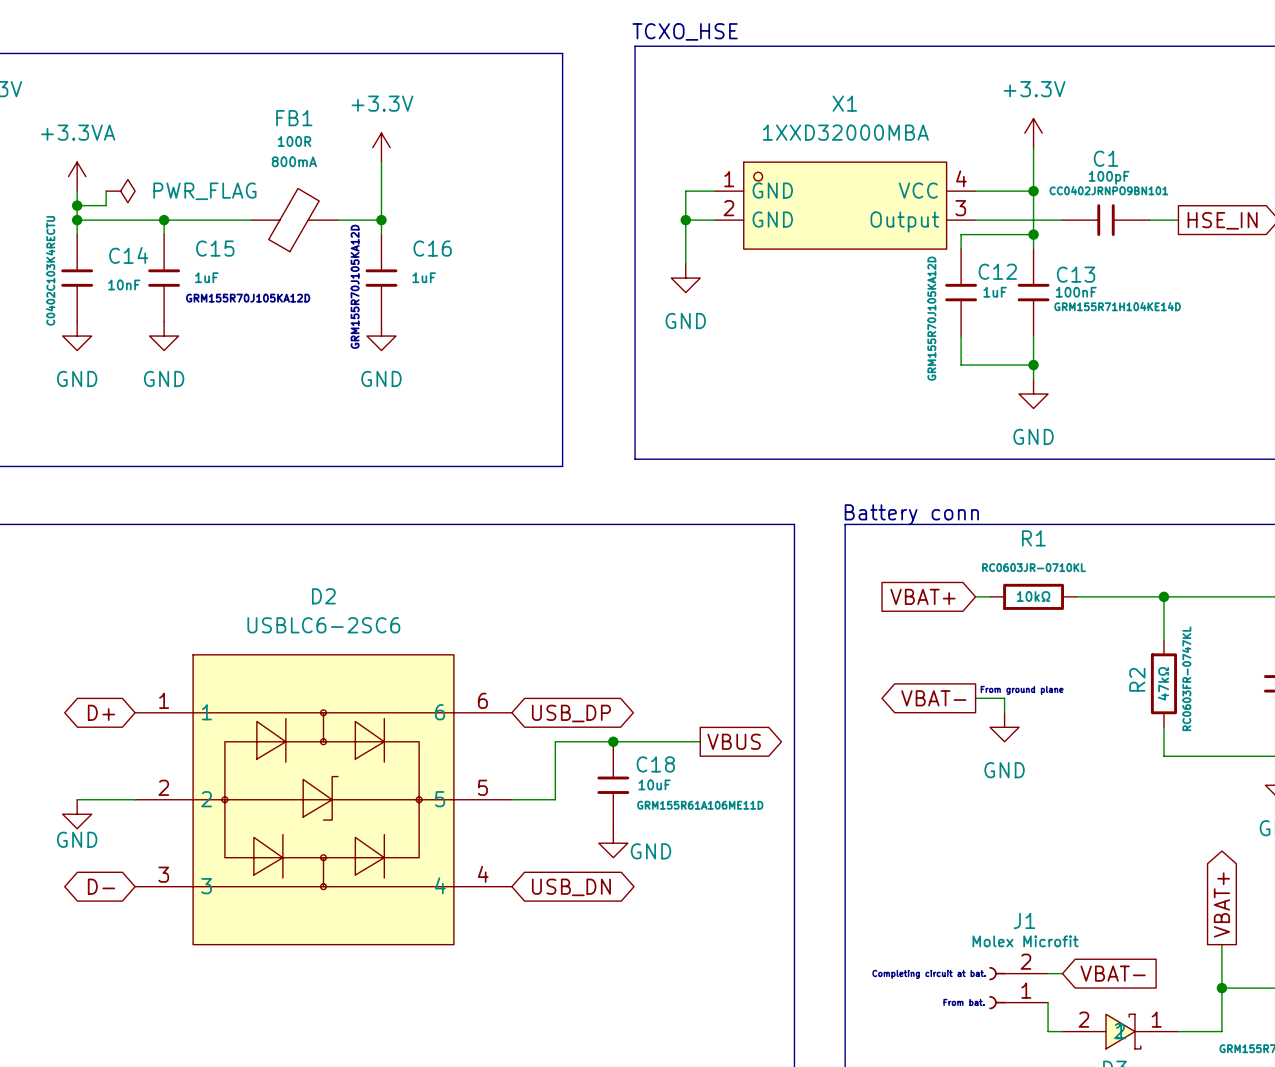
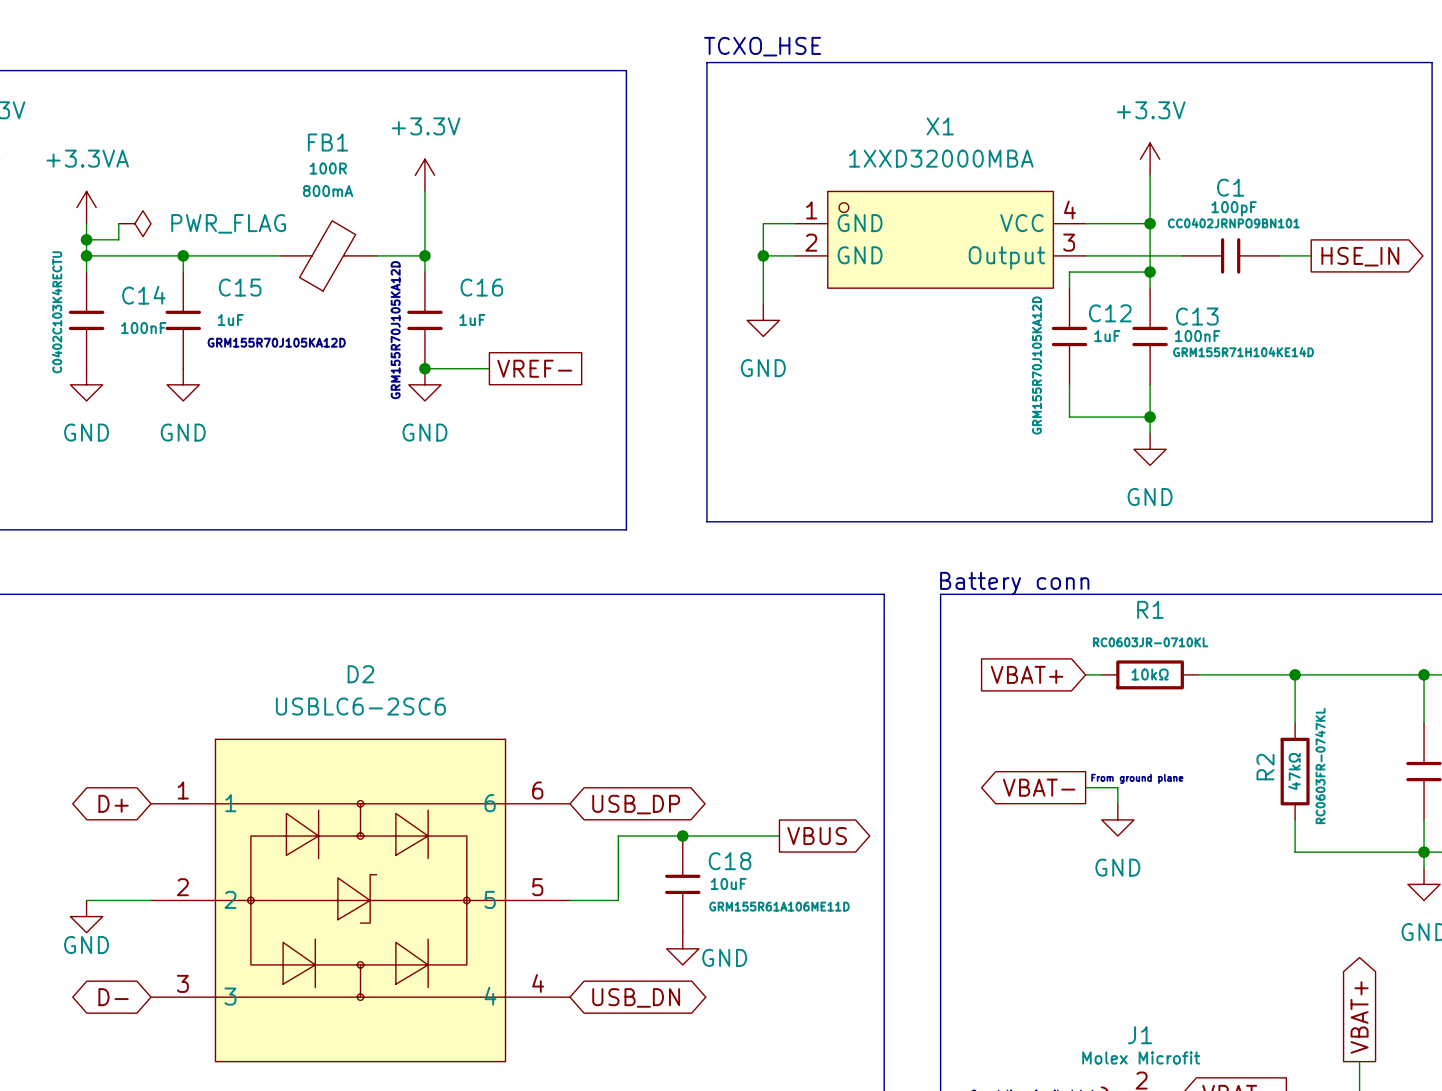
C14 value: 10nF (124, 284) -> 100nF (143, 328)
wire: none -> (424, 368) (489, 368)
junction: none -> (424, 368)
global label: none -> VREF- (534, 368)

